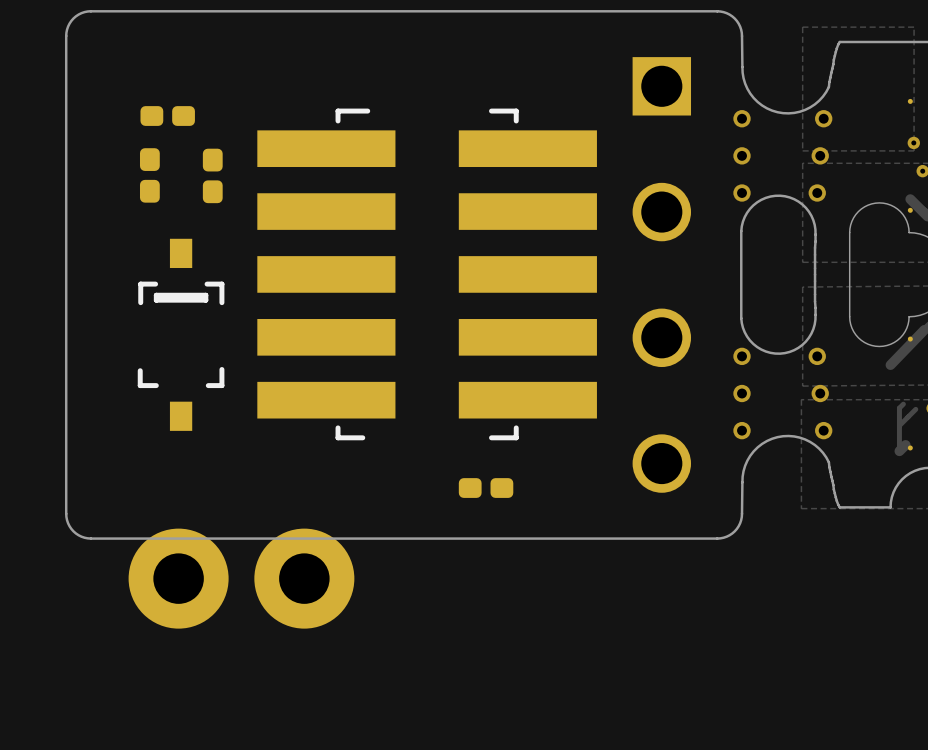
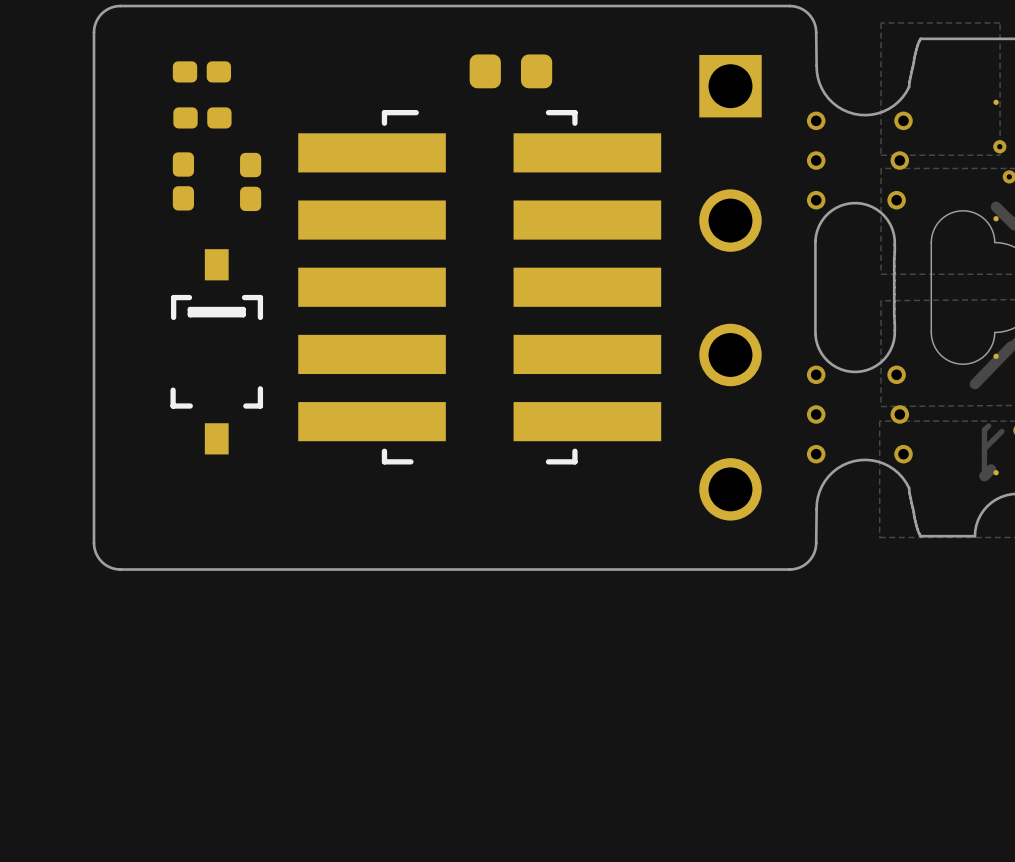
part: none -> (510, 71)
part position: (486, 488) -> (201, 71)
part: (241, 578) -> none

